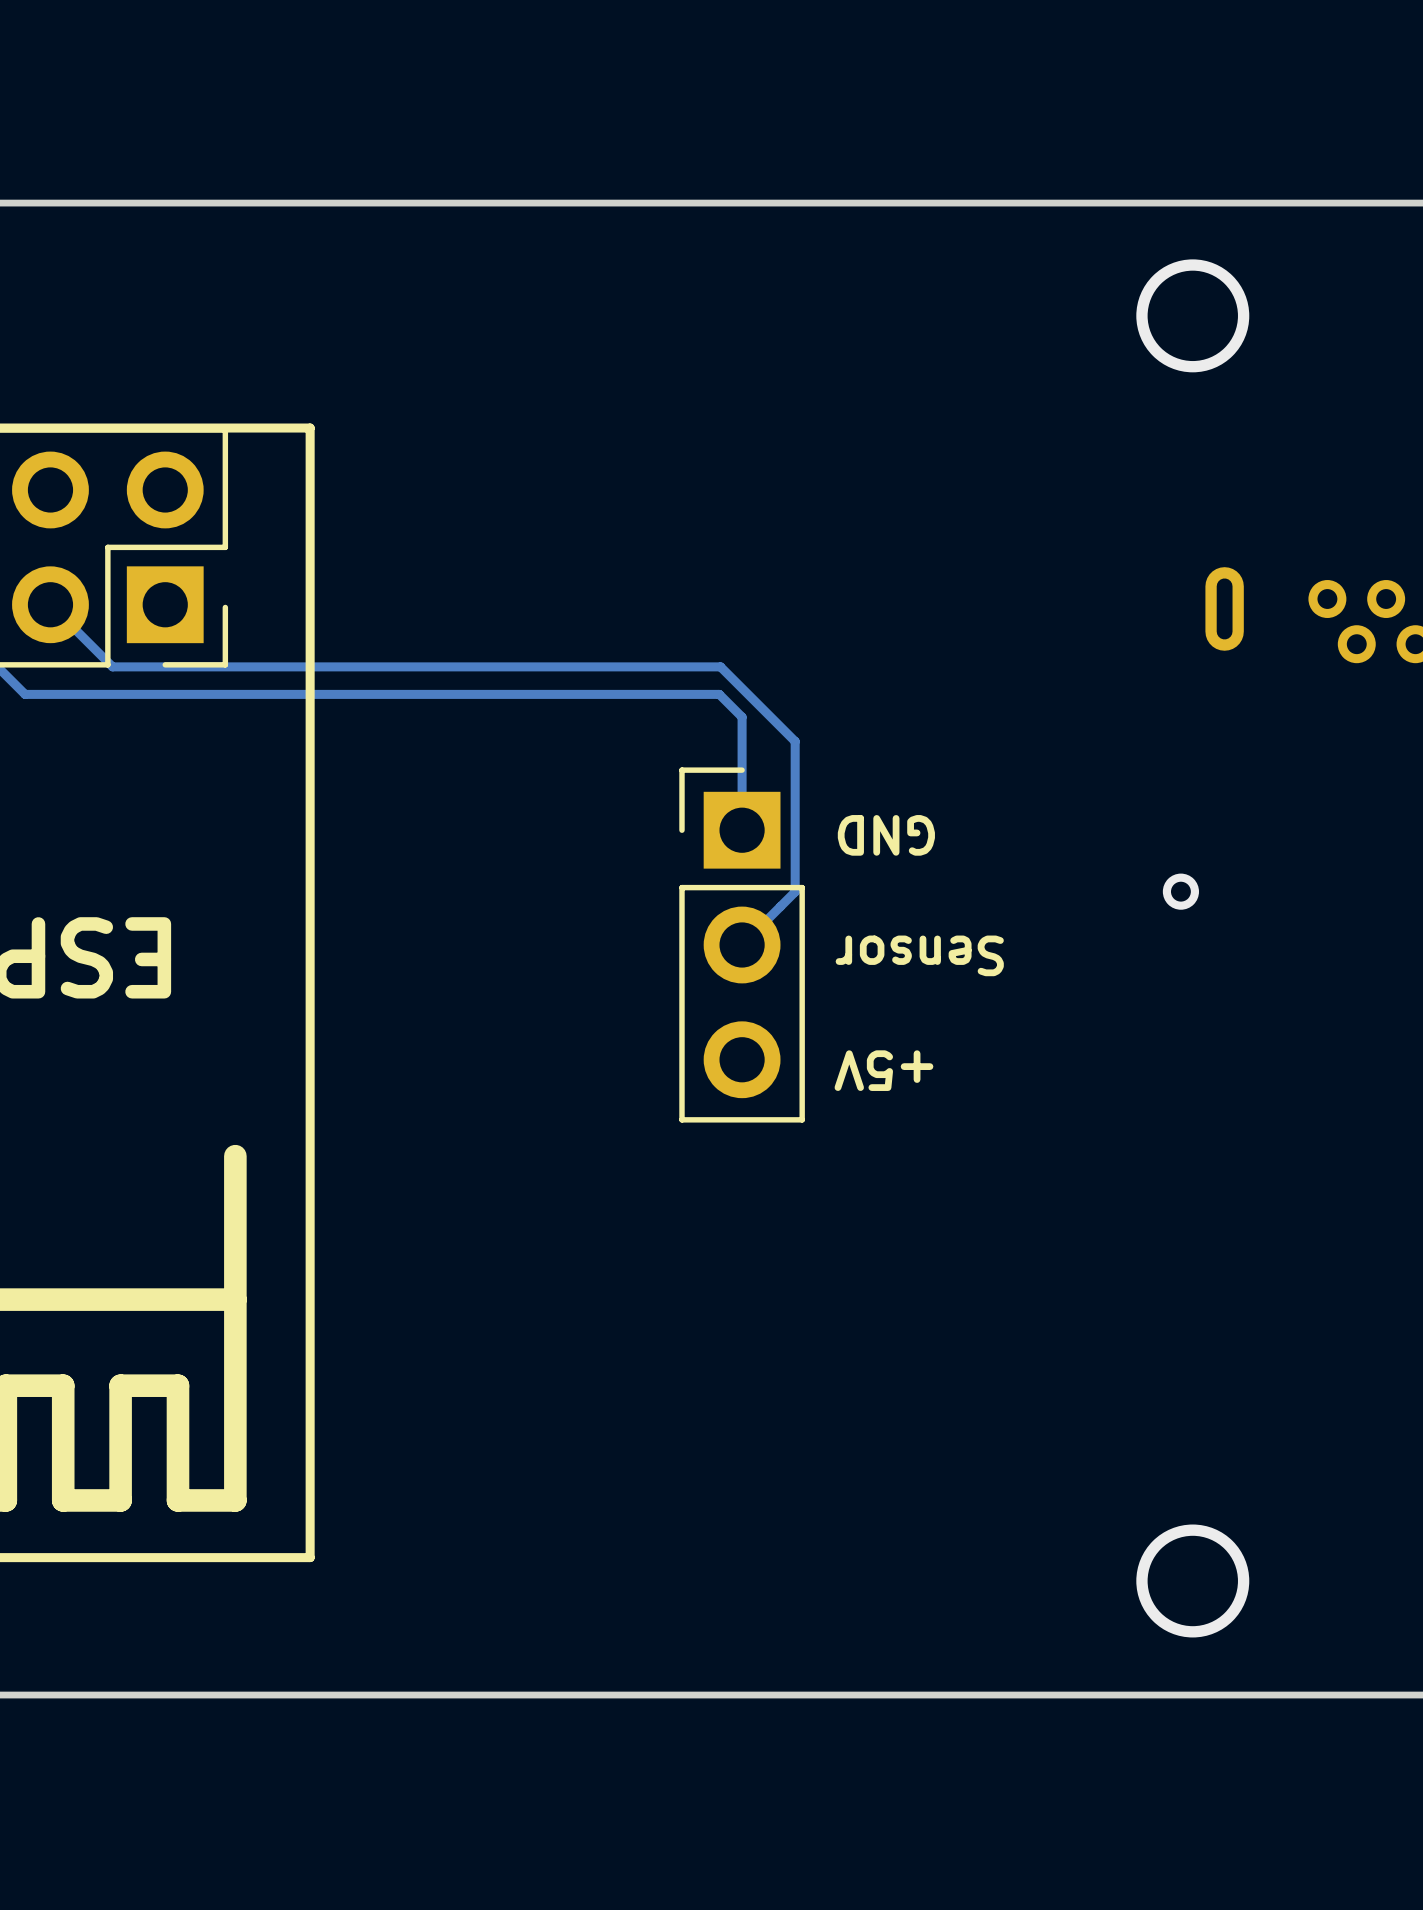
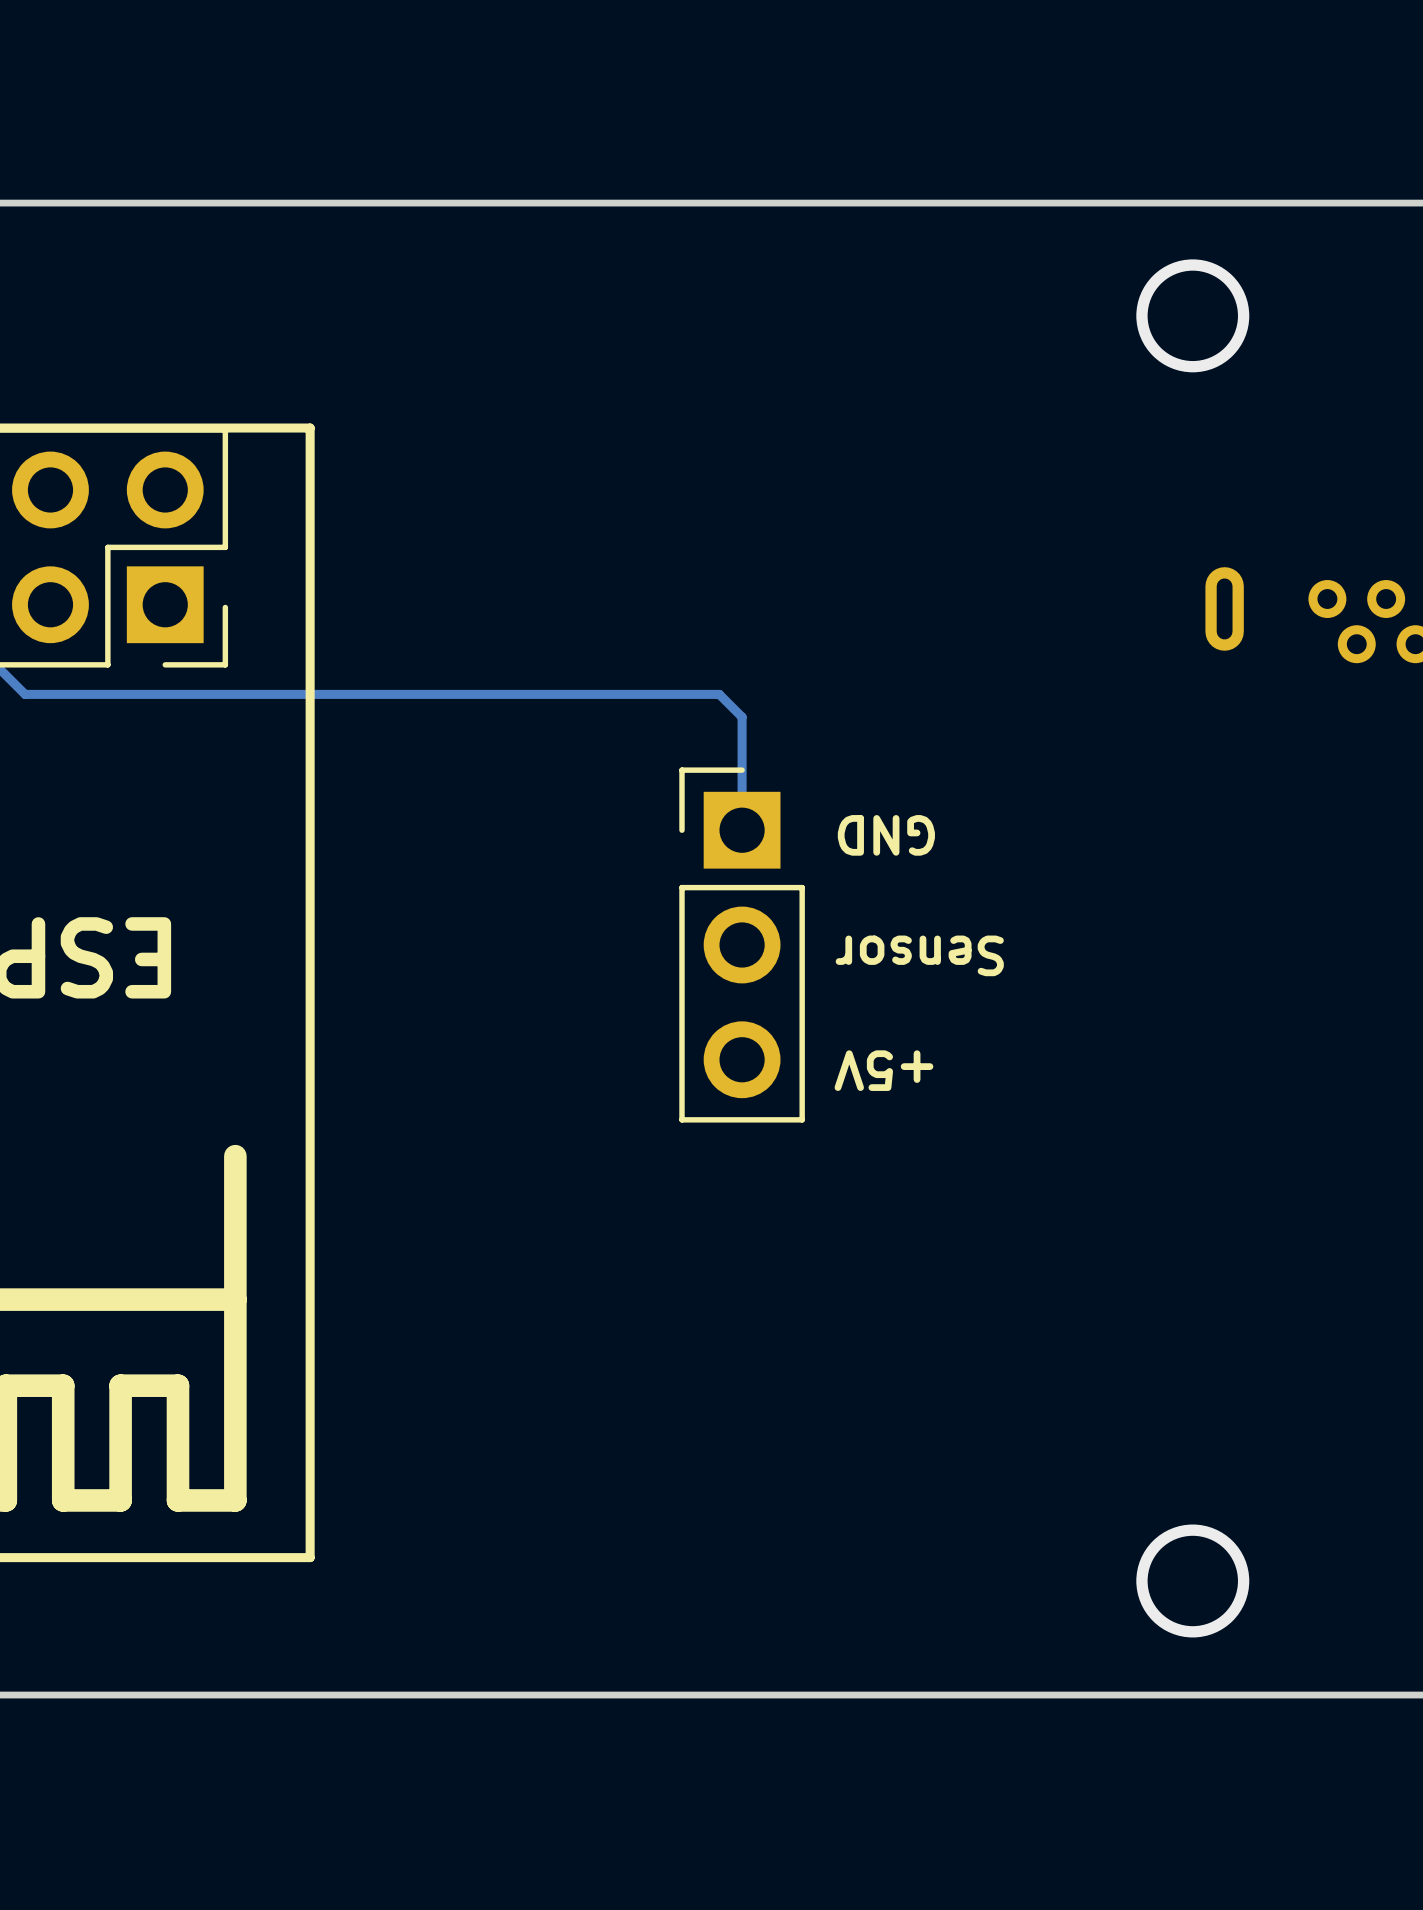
track: (50, 604) (112, 666) (720, 666) (795, 741) (795, 891) (742, 944) -> none
via: (1180, 891) -> none

